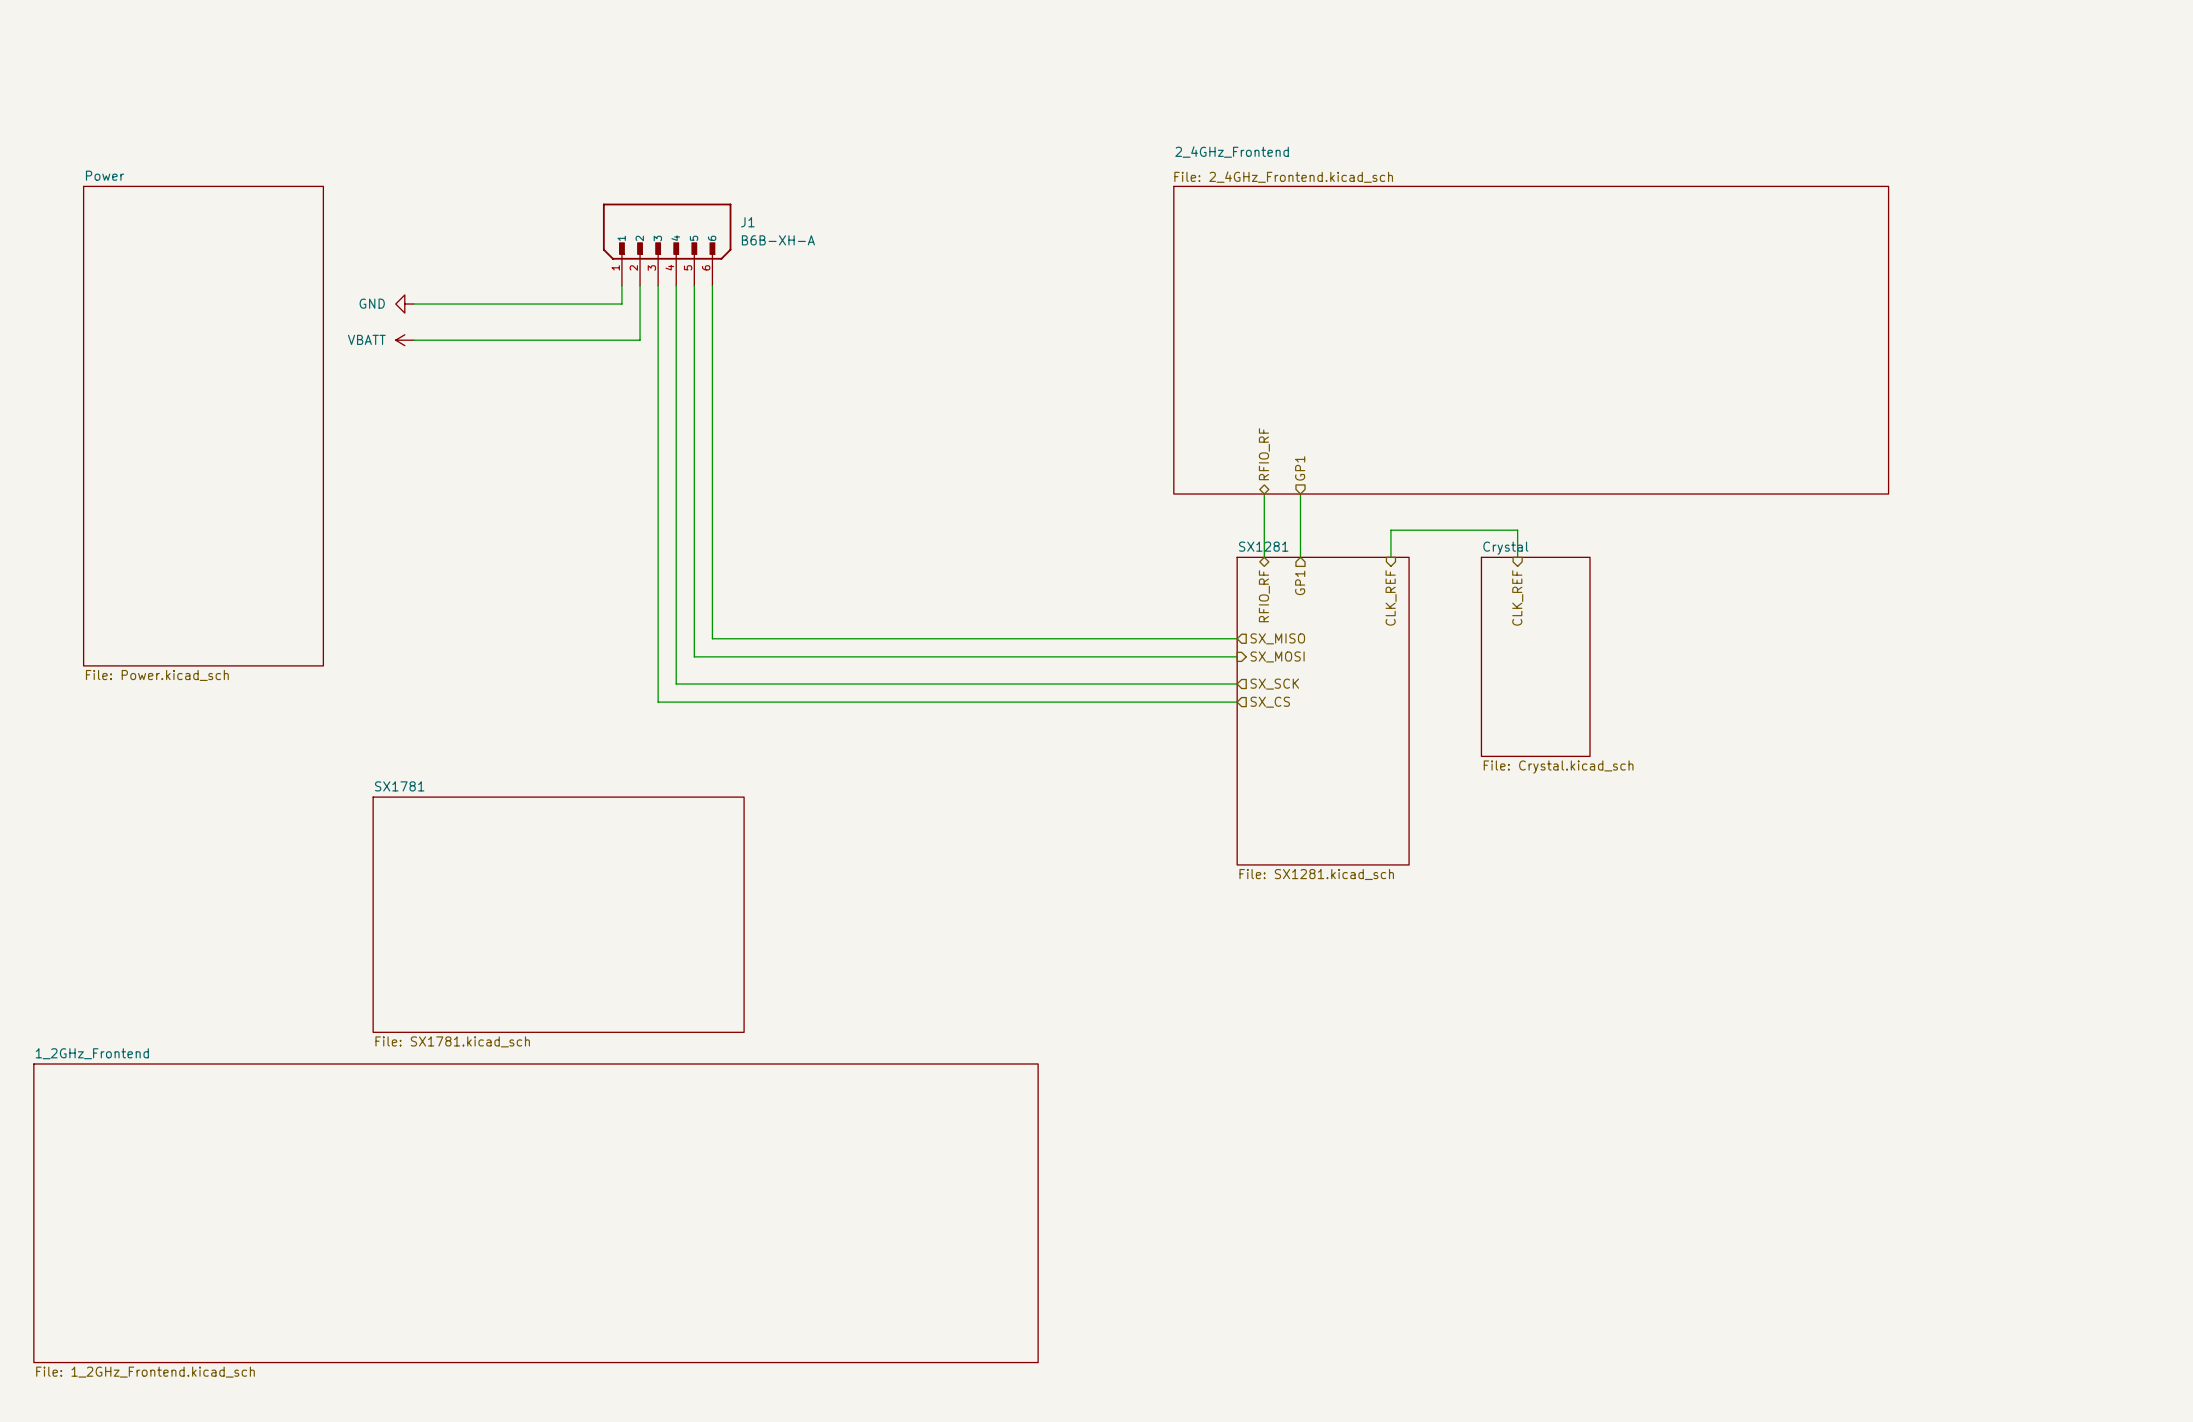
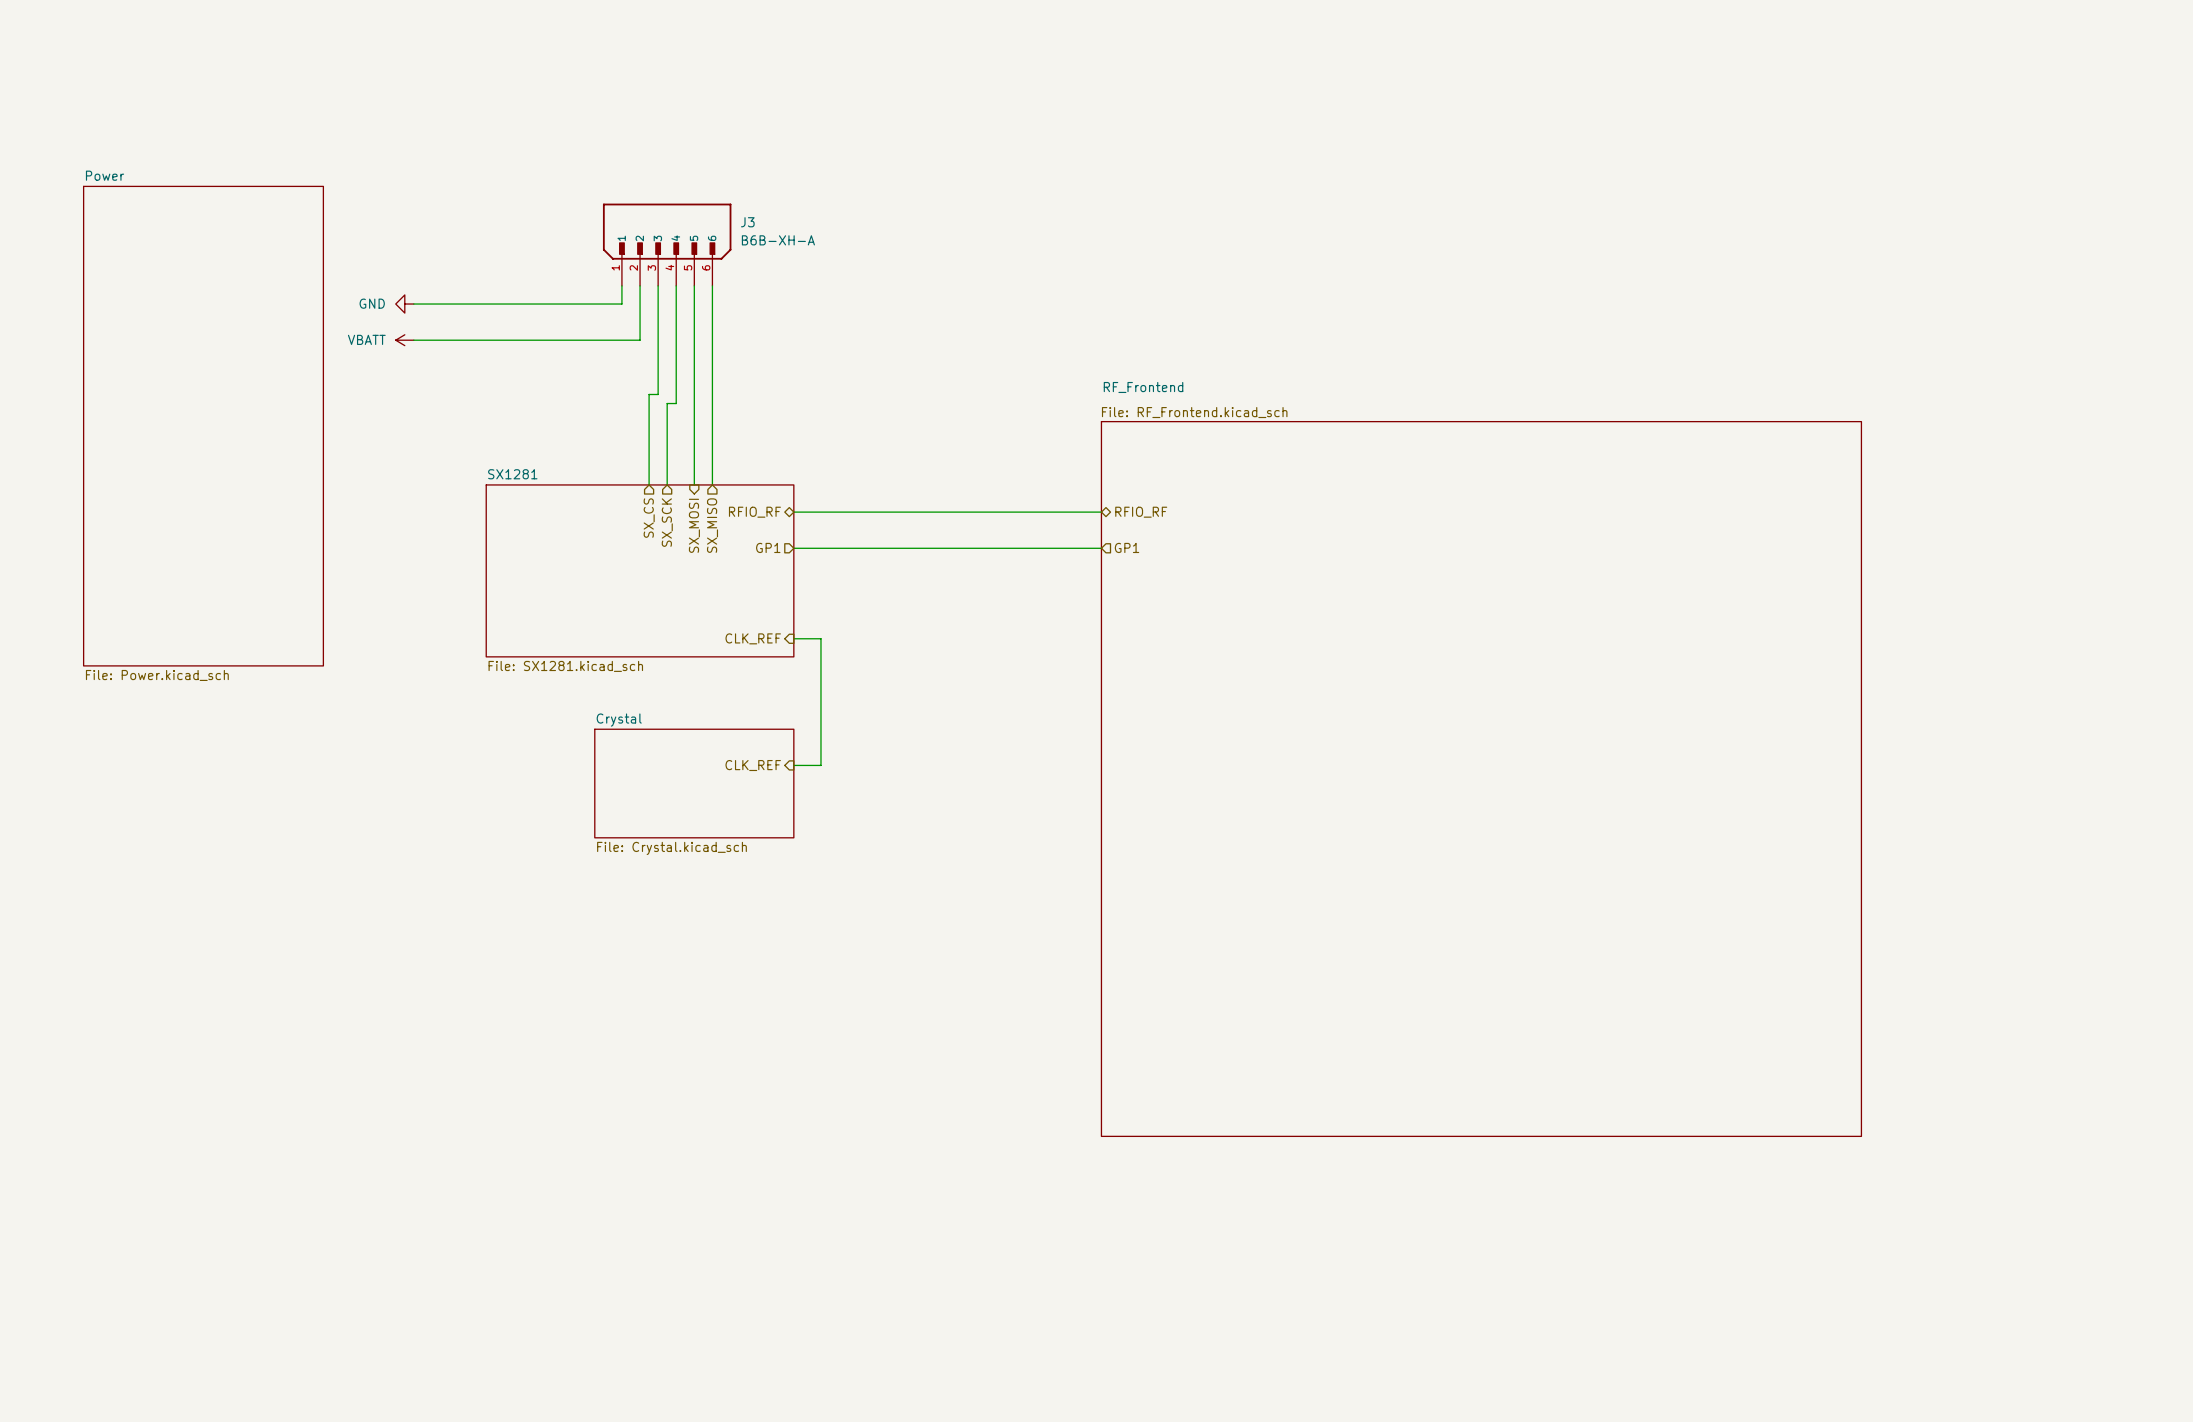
J1 name: J1 (747, 222) -> J3 (747, 222)
sheet 2_4GHz_Frontend: File: 2_4GHz_Frontend.kicad_sch (1531, 340) -> none
wire: (658, 394) (658, 702) (1237, 702) -> (658, 394) (649, 394) (649, 484)
wire: (676, 403) (676, 684) (1237, 684) -> (676, 403) (667, 403) (667, 484)
hierarchical label: RFIO_RF (1264, 454) -> none
hierarchical label: GP1 (1300, 468) -> none
wire: (694, 484) (694, 656) (1237, 656) -> none
wire: (712, 484) (712, 638) (793, 638) -> none
wire: (1264, 494) (1264, 557) -> none
wire: (1300, 494) (1300, 557) -> none
hierarchical label: none -> RFIO_RF (754, 512)
wire: none -> (793, 512) (1101, 512)
hierarchical label: none -> RFIO_RF (1141, 512)
hierarchical label: none -> SX_CS (649, 518)
hierarchical label: none -> SX_SCK (667, 522)
hierarchical label: none -> SX_MOSI (694, 525)
hierarchical label: none -> SX_MISO (712, 525)
sheet SX1281 name position: SX1281 (1263, 546) -> SX1281 (512, 474)
hierarchical label: none -> GP1 (768, 547)
hierarchical label: none -> GP1 (1127, 547)
wire: none -> (793, 548) (1101, 548)
wire: (1390, 557) (1390, 530) (1517, 530) (1517, 557) -> none
hierarchical label: GP1 (1300, 582) -> none
hierarchical label: RFIO_RF (1264, 596) -> none
hierarchical label: CLK_REF (1391, 597) -> none
hierarchical label: CLK_REF (1517, 597) -> none
hierarchical label: none -> CLK_REF (753, 638)
wire: (820, 638) (1237, 638) -> (820, 638) (820, 765) (793, 765)
hierarchical label: SX_MISO (1277, 638) -> none
hierarchical label: SX_MOSI (1277, 656) -> none
sheet Crystal: File: Crystal.kicad_sch (1535, 656) -> none
hierarchical label: SX_SCK (1274, 684) -> none
hierarchical label: SX_CS (1270, 702) -> none
sheet SX1281 rotation: 0° (1323, 711) -> 90° clockwise (640, 570)
sheet SX1281 position: (1323, 711) -> (640, 570)
hierarchical label: none -> CLK_REF (753, 765)
sheet RF_Frontend: none -> File: RF_Frontend.kicad_sch (1481, 779)
sheet Crystal: none -> File: Crystal.kicad_sch (694, 783)
sheet SX1281 value position: File: SX1281.kicad_sch (1316, 874) -> File: SX1281.kicad_sch (565, 666)
sheet SX1781: File: SX1781.kicad_sch (558, 914) -> none
sheet 1_2GHz_Frontend: File: 1_2GHz_Frontend.kicad_sch (535, 1213) -> none

